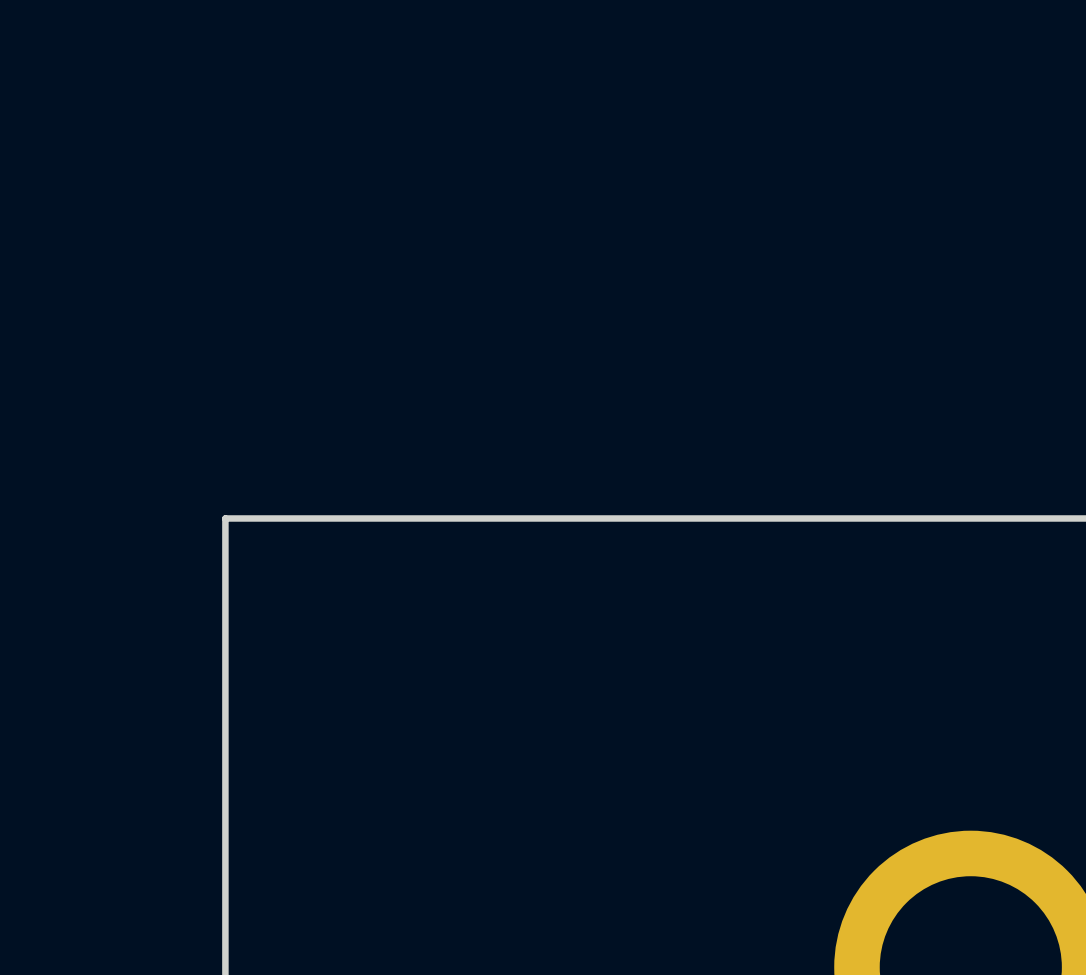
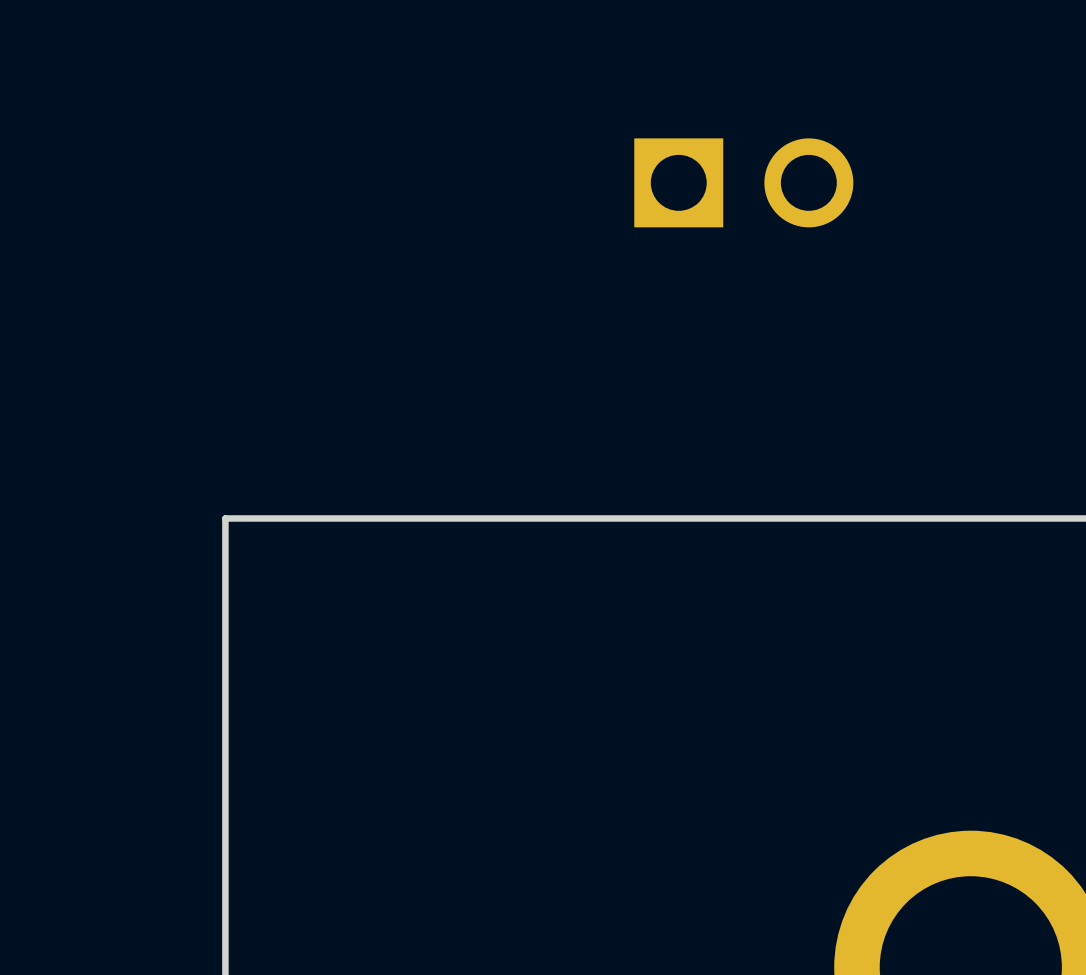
part: none -> (743, 182)

